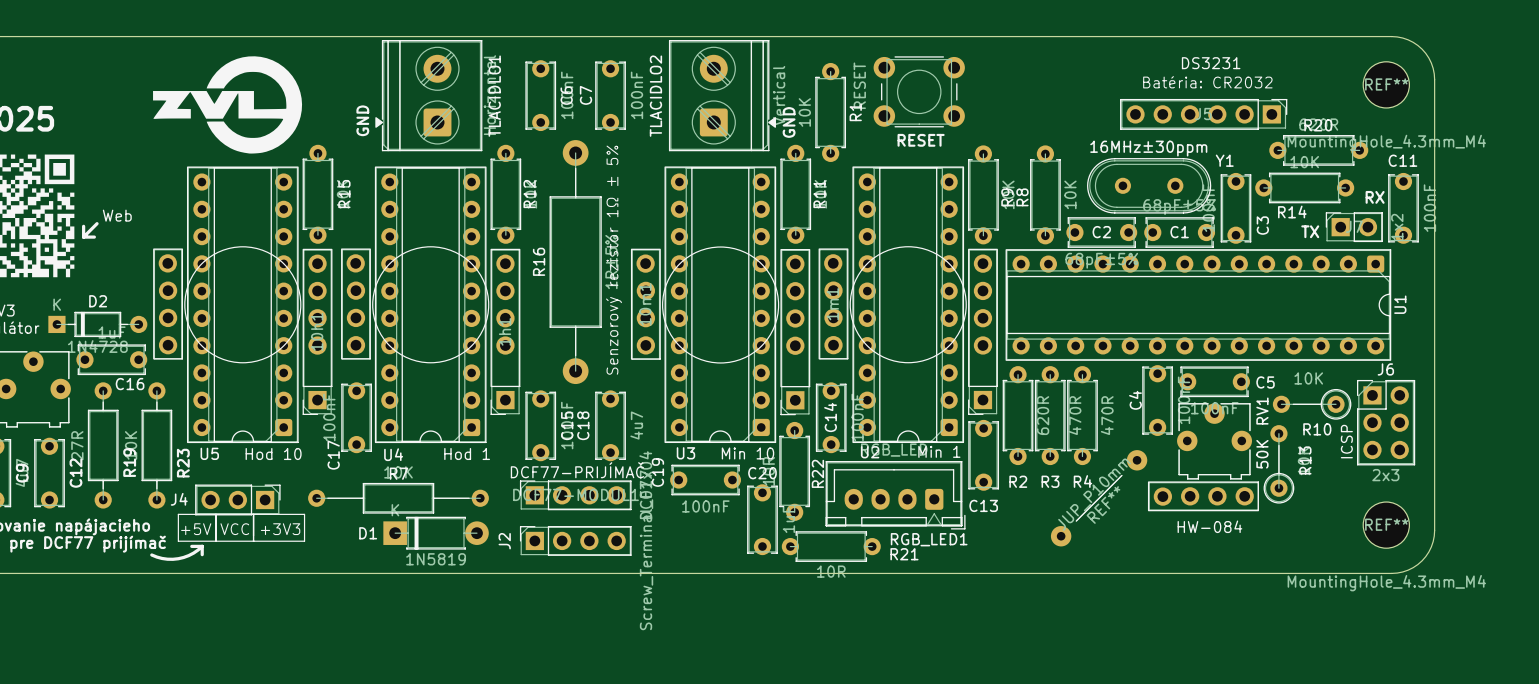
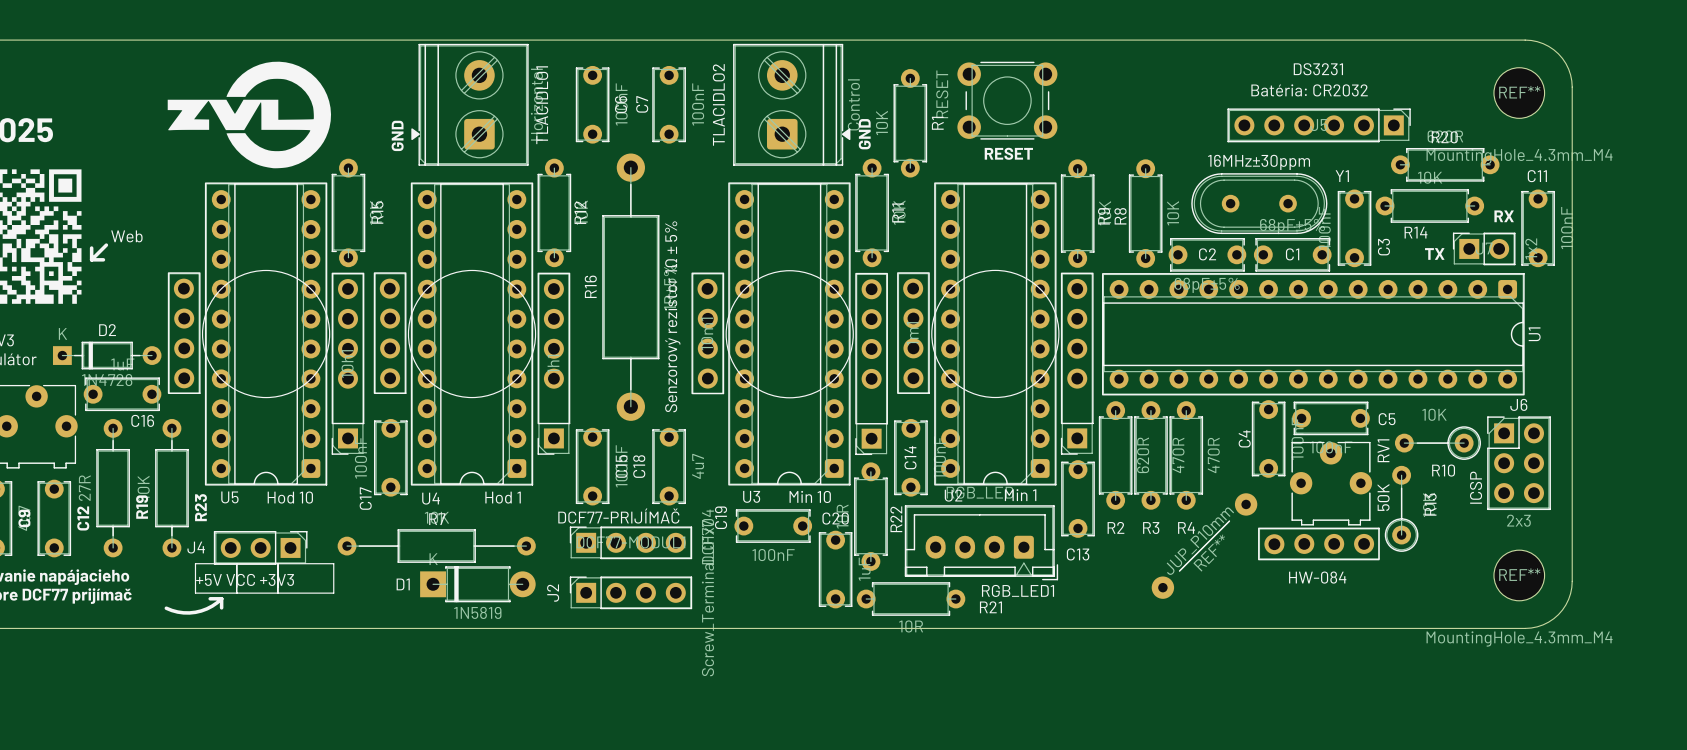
TLACIDLO2 value: Vertical (779, 95) -> Control (853, 104)

